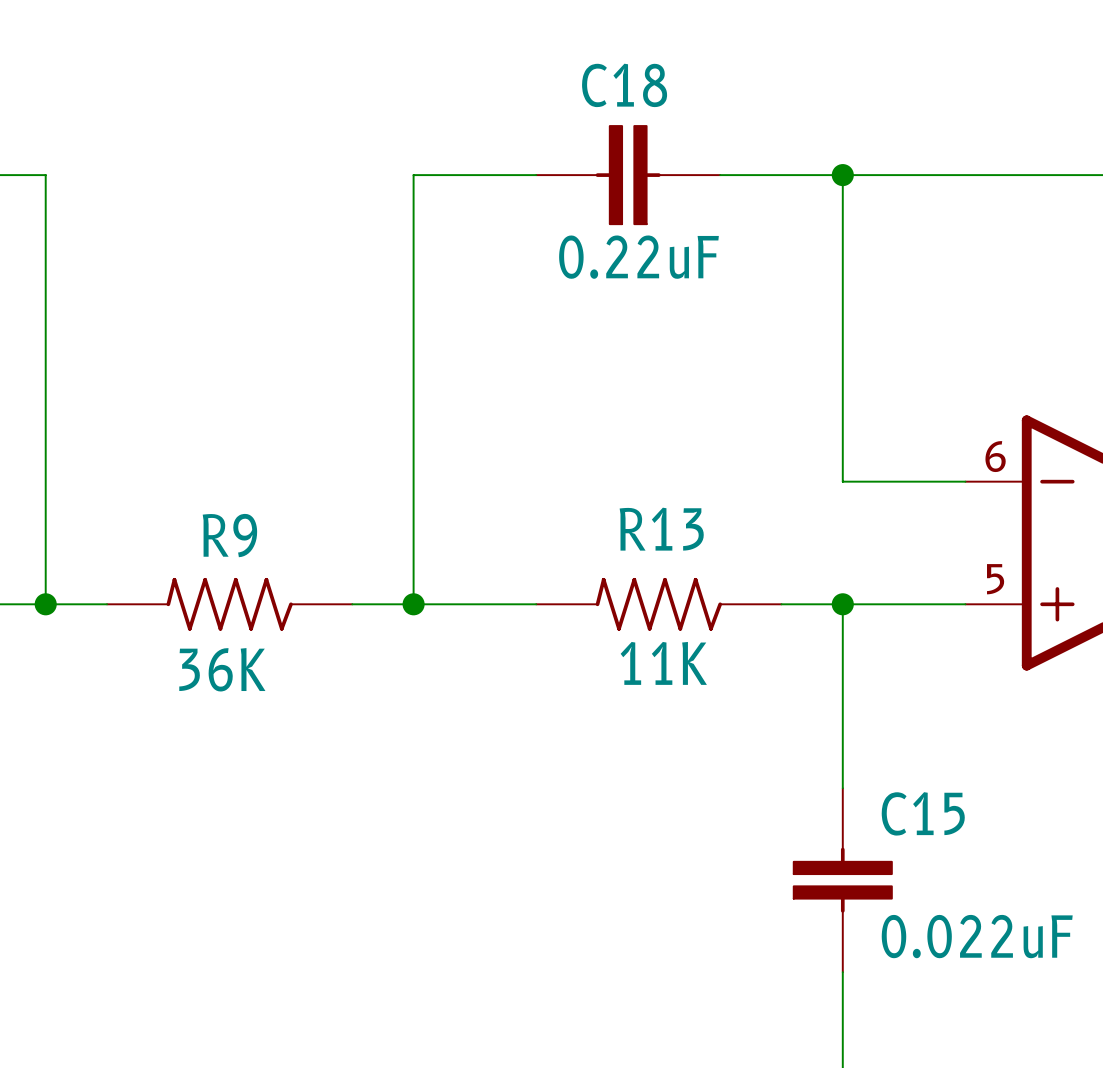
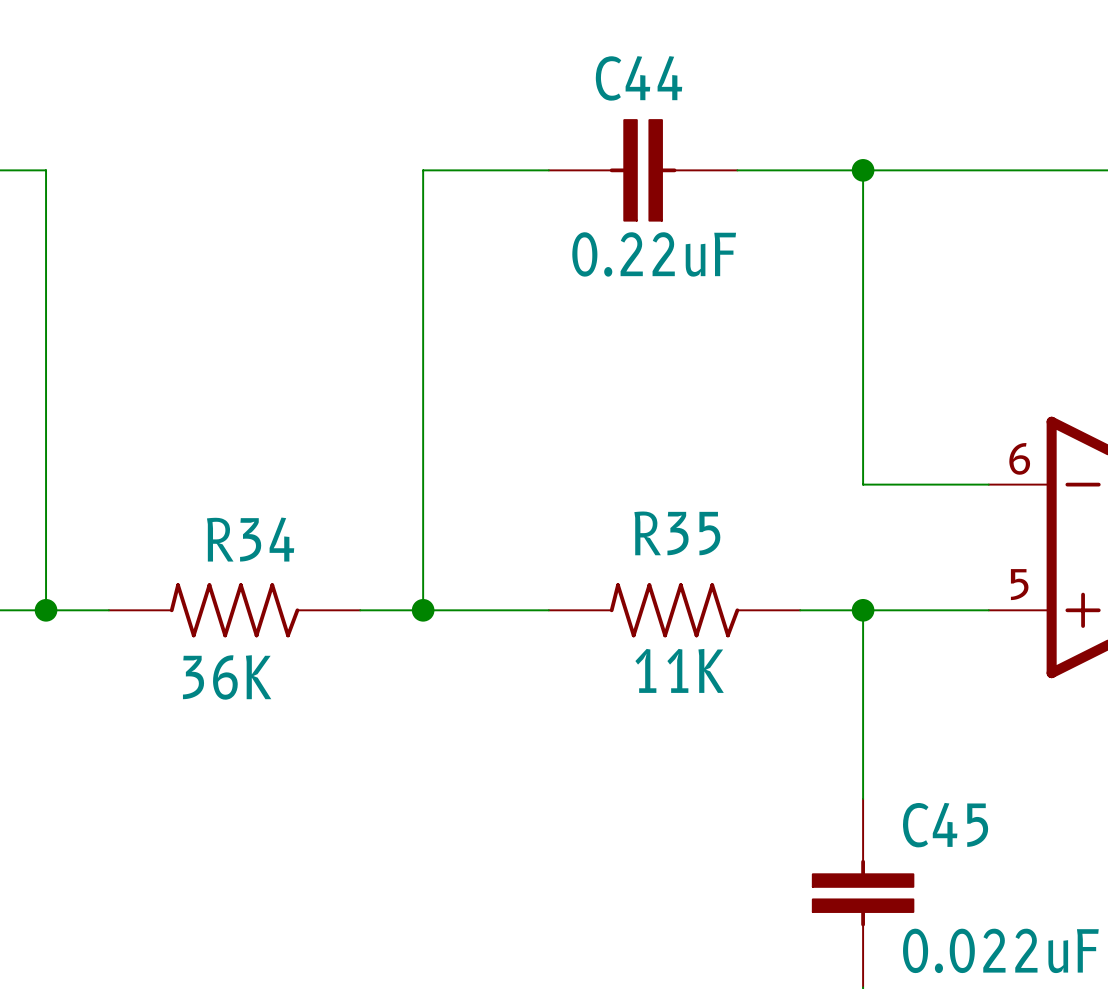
C18 name: C18 (624, 85) -> C44 (639, 78)
R13 name: R13 (661, 529) -> R35 (677, 533)
R9 name: R9 (229, 535) -> R34 (250, 539)
C15 name: C15 (923, 813) -> C45 (945, 825)

